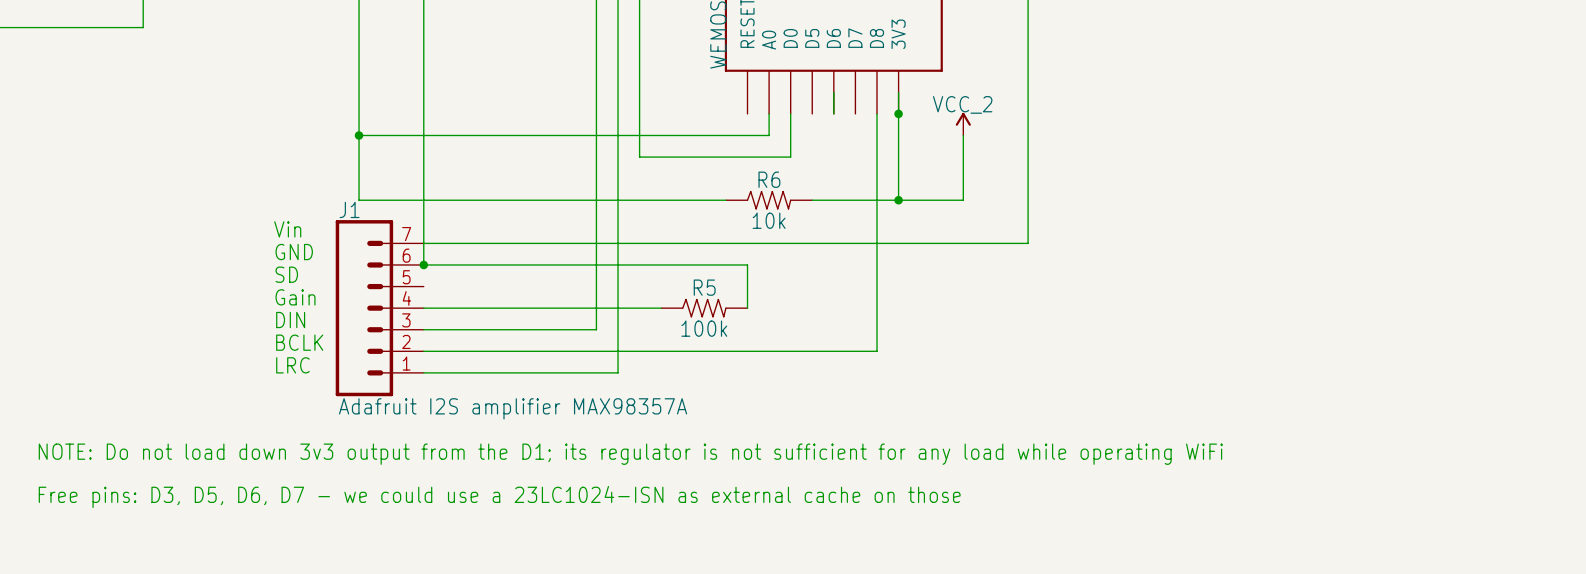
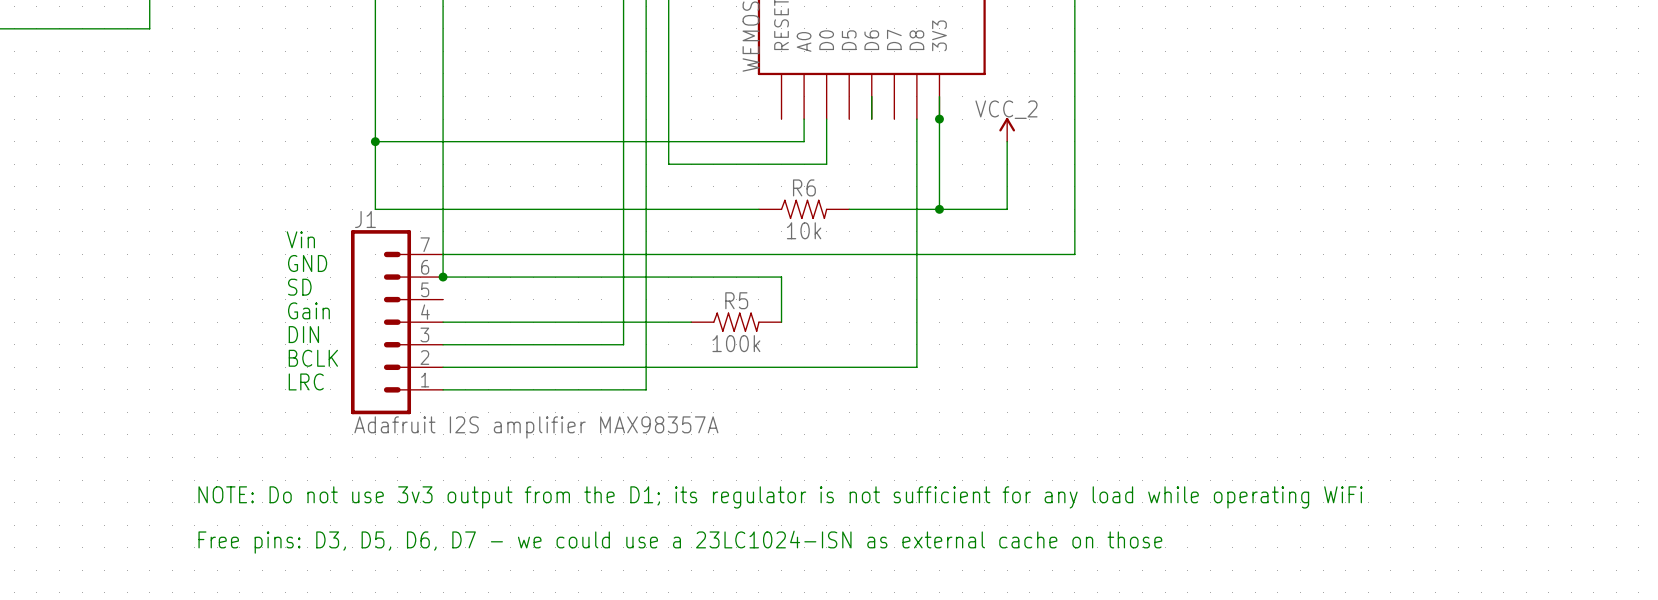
text: NOTE: Do not load down 3v3 output from the D1; its regulator is not sufficient for any load while operating WiFi (630, 454) -> NOTE: Do not use 3v3 output from the D1; its regulator is not sufficient for any load while operating WiFi (780, 497)
text position: Free pins: D3, D5, D6, D7 - we could use a 23LC1024-ISN as external cache on those (499, 496) -> Free pins: D3, D5, D6, D7 - we could use a 23LC1024-ISN as external cache on those (680, 542)

